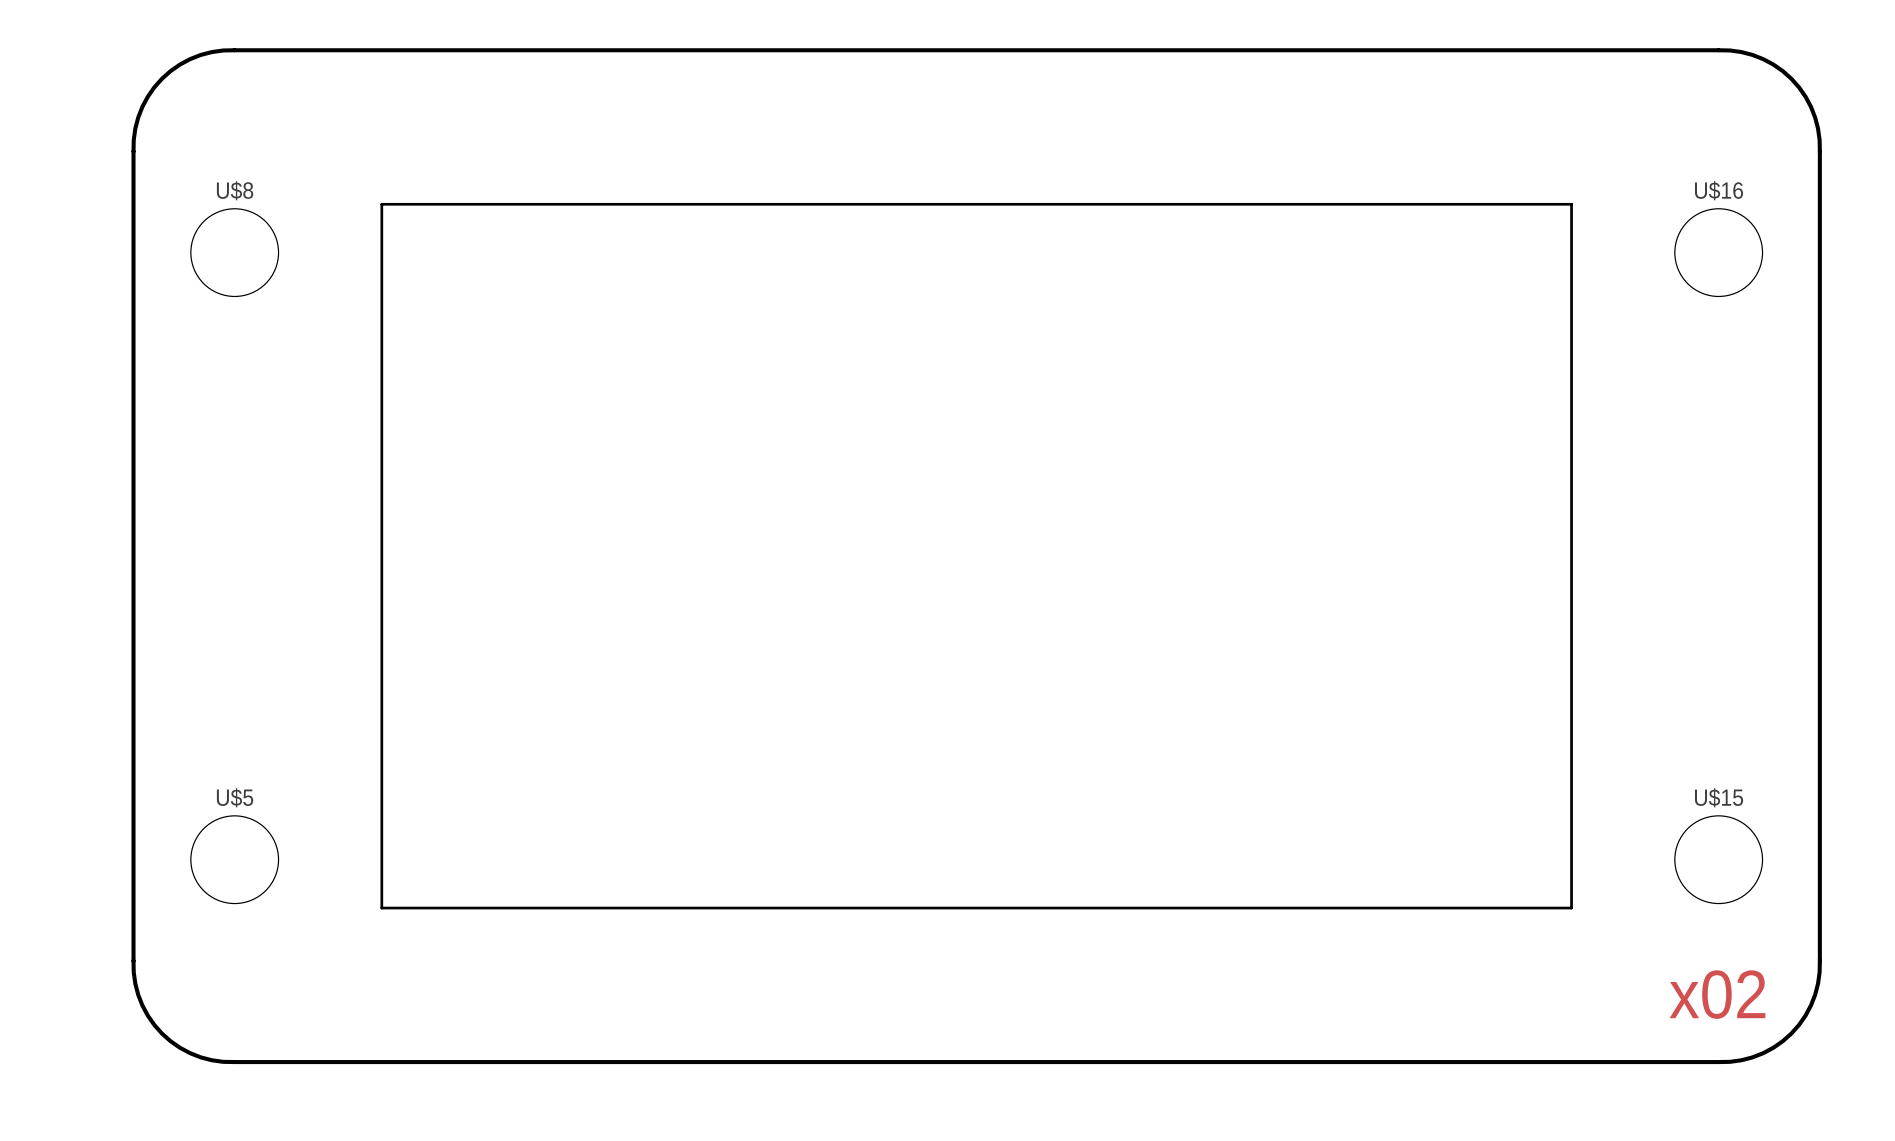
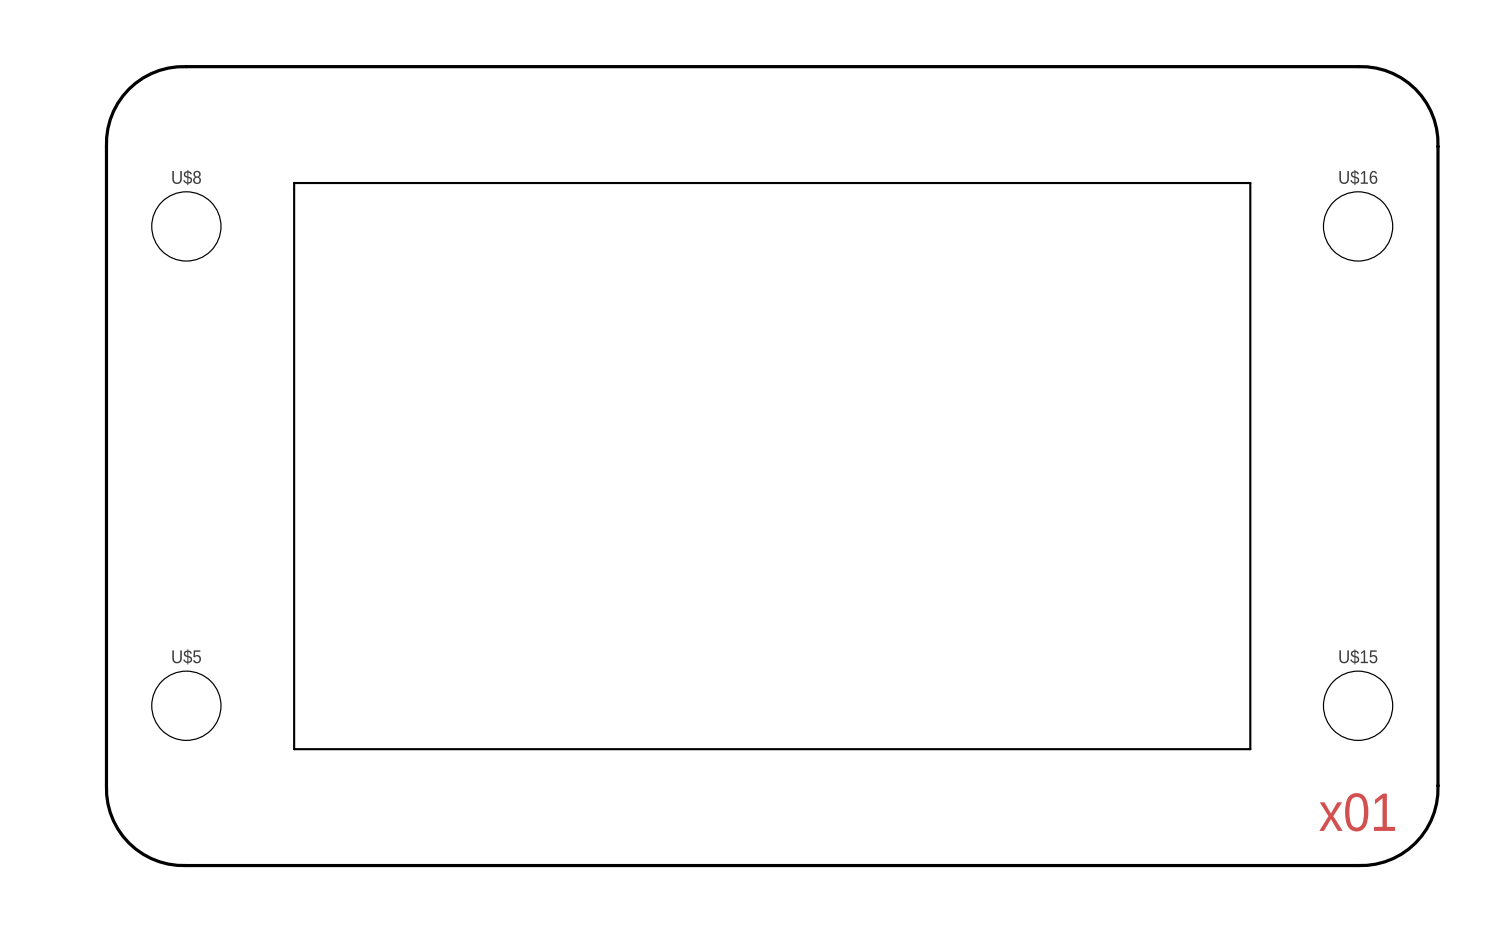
drawing shape: [380, 202, 1573, 910] -> [293, 181, 1252, 751]
text: x02 (1717, 994) -> x01 (1357, 812)

